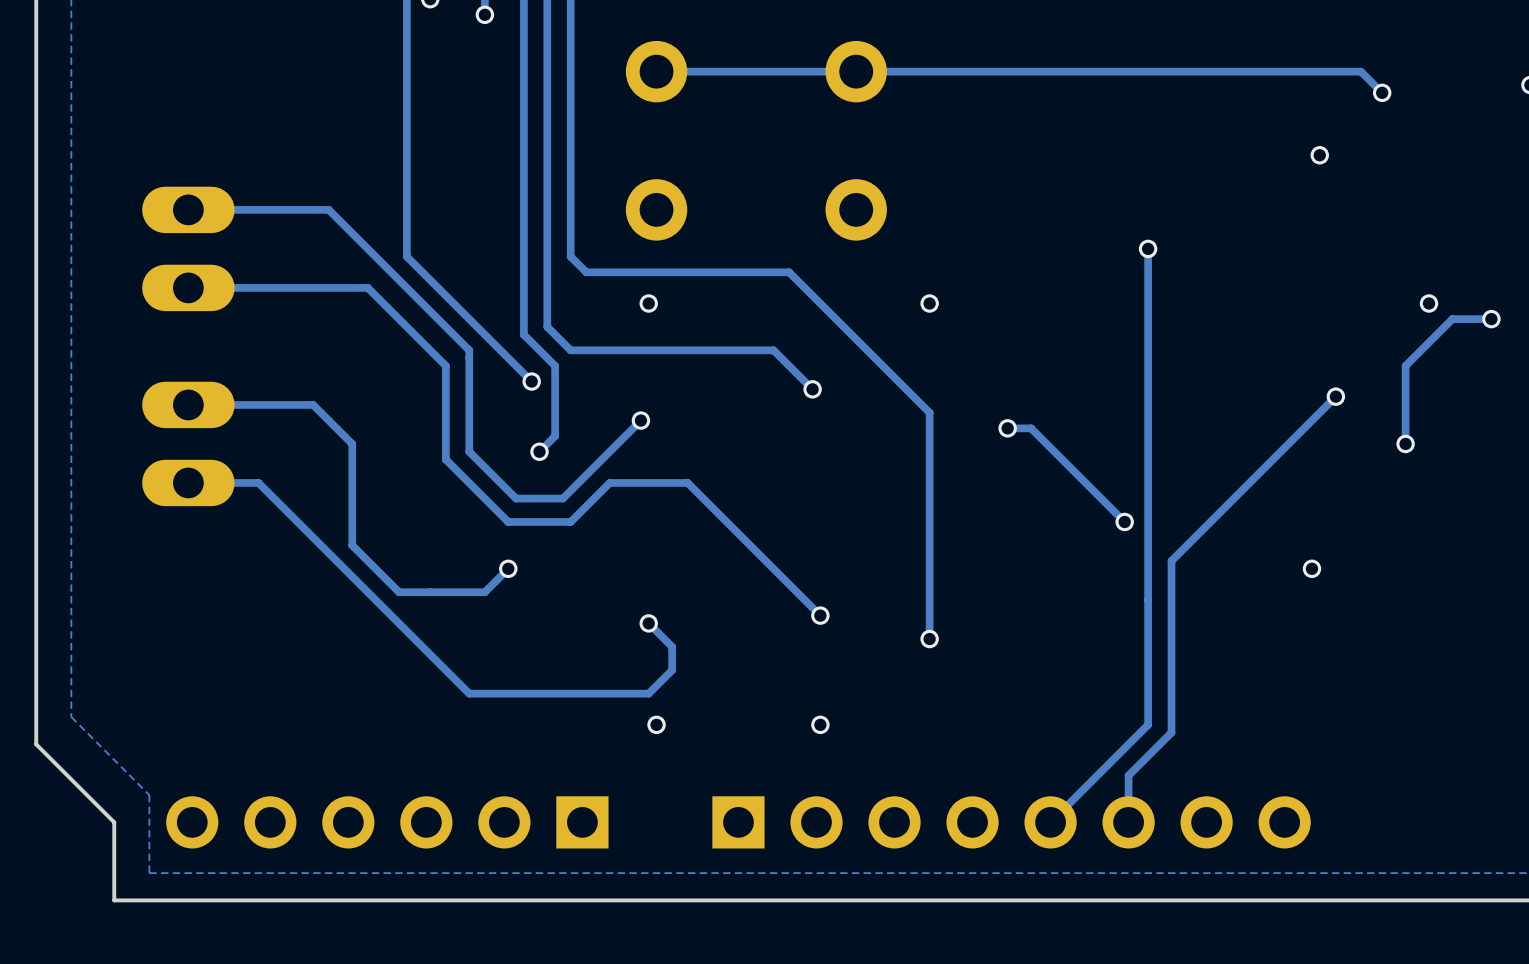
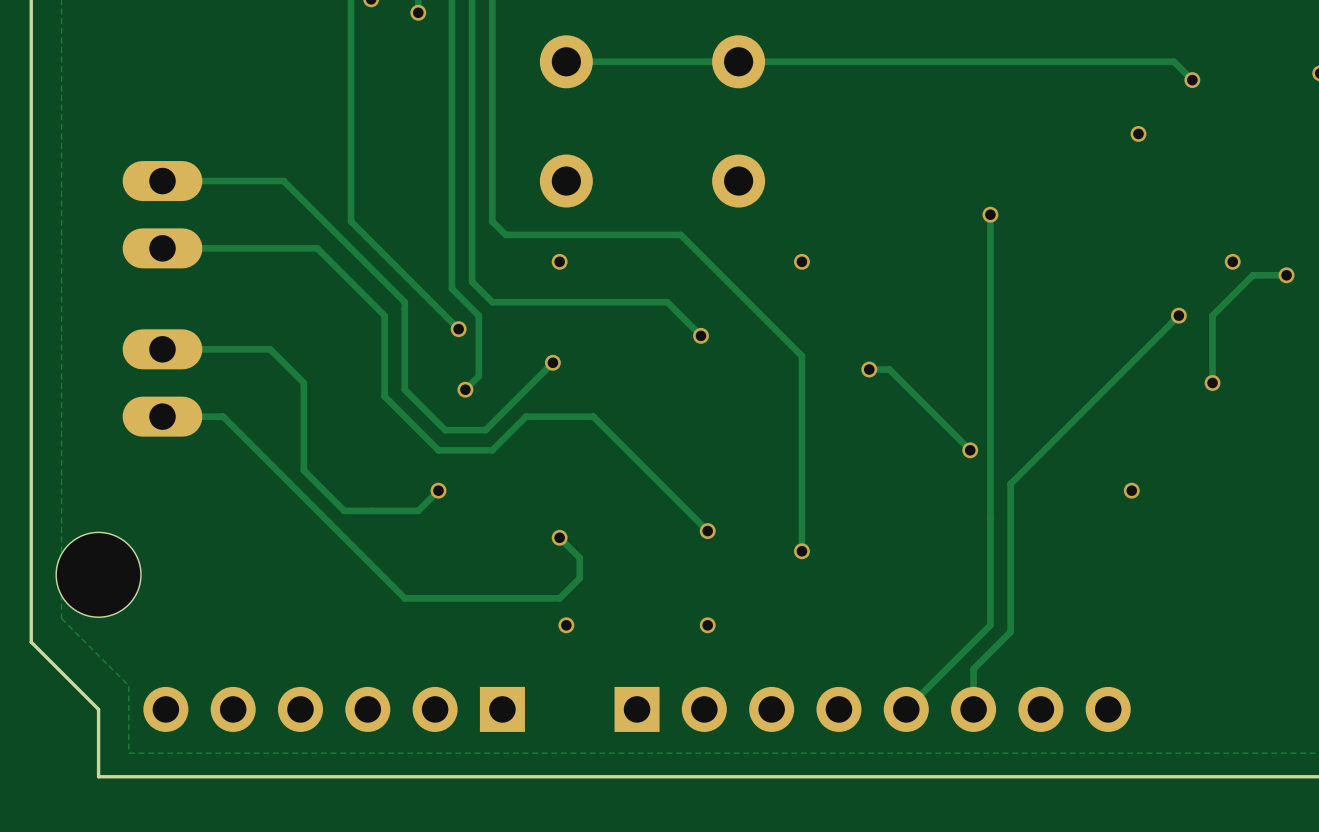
track: none -> (1178, 315) (1152, 342)
via position: (1335, 396) -> (1178, 315)
part: none -> (98, 574)

